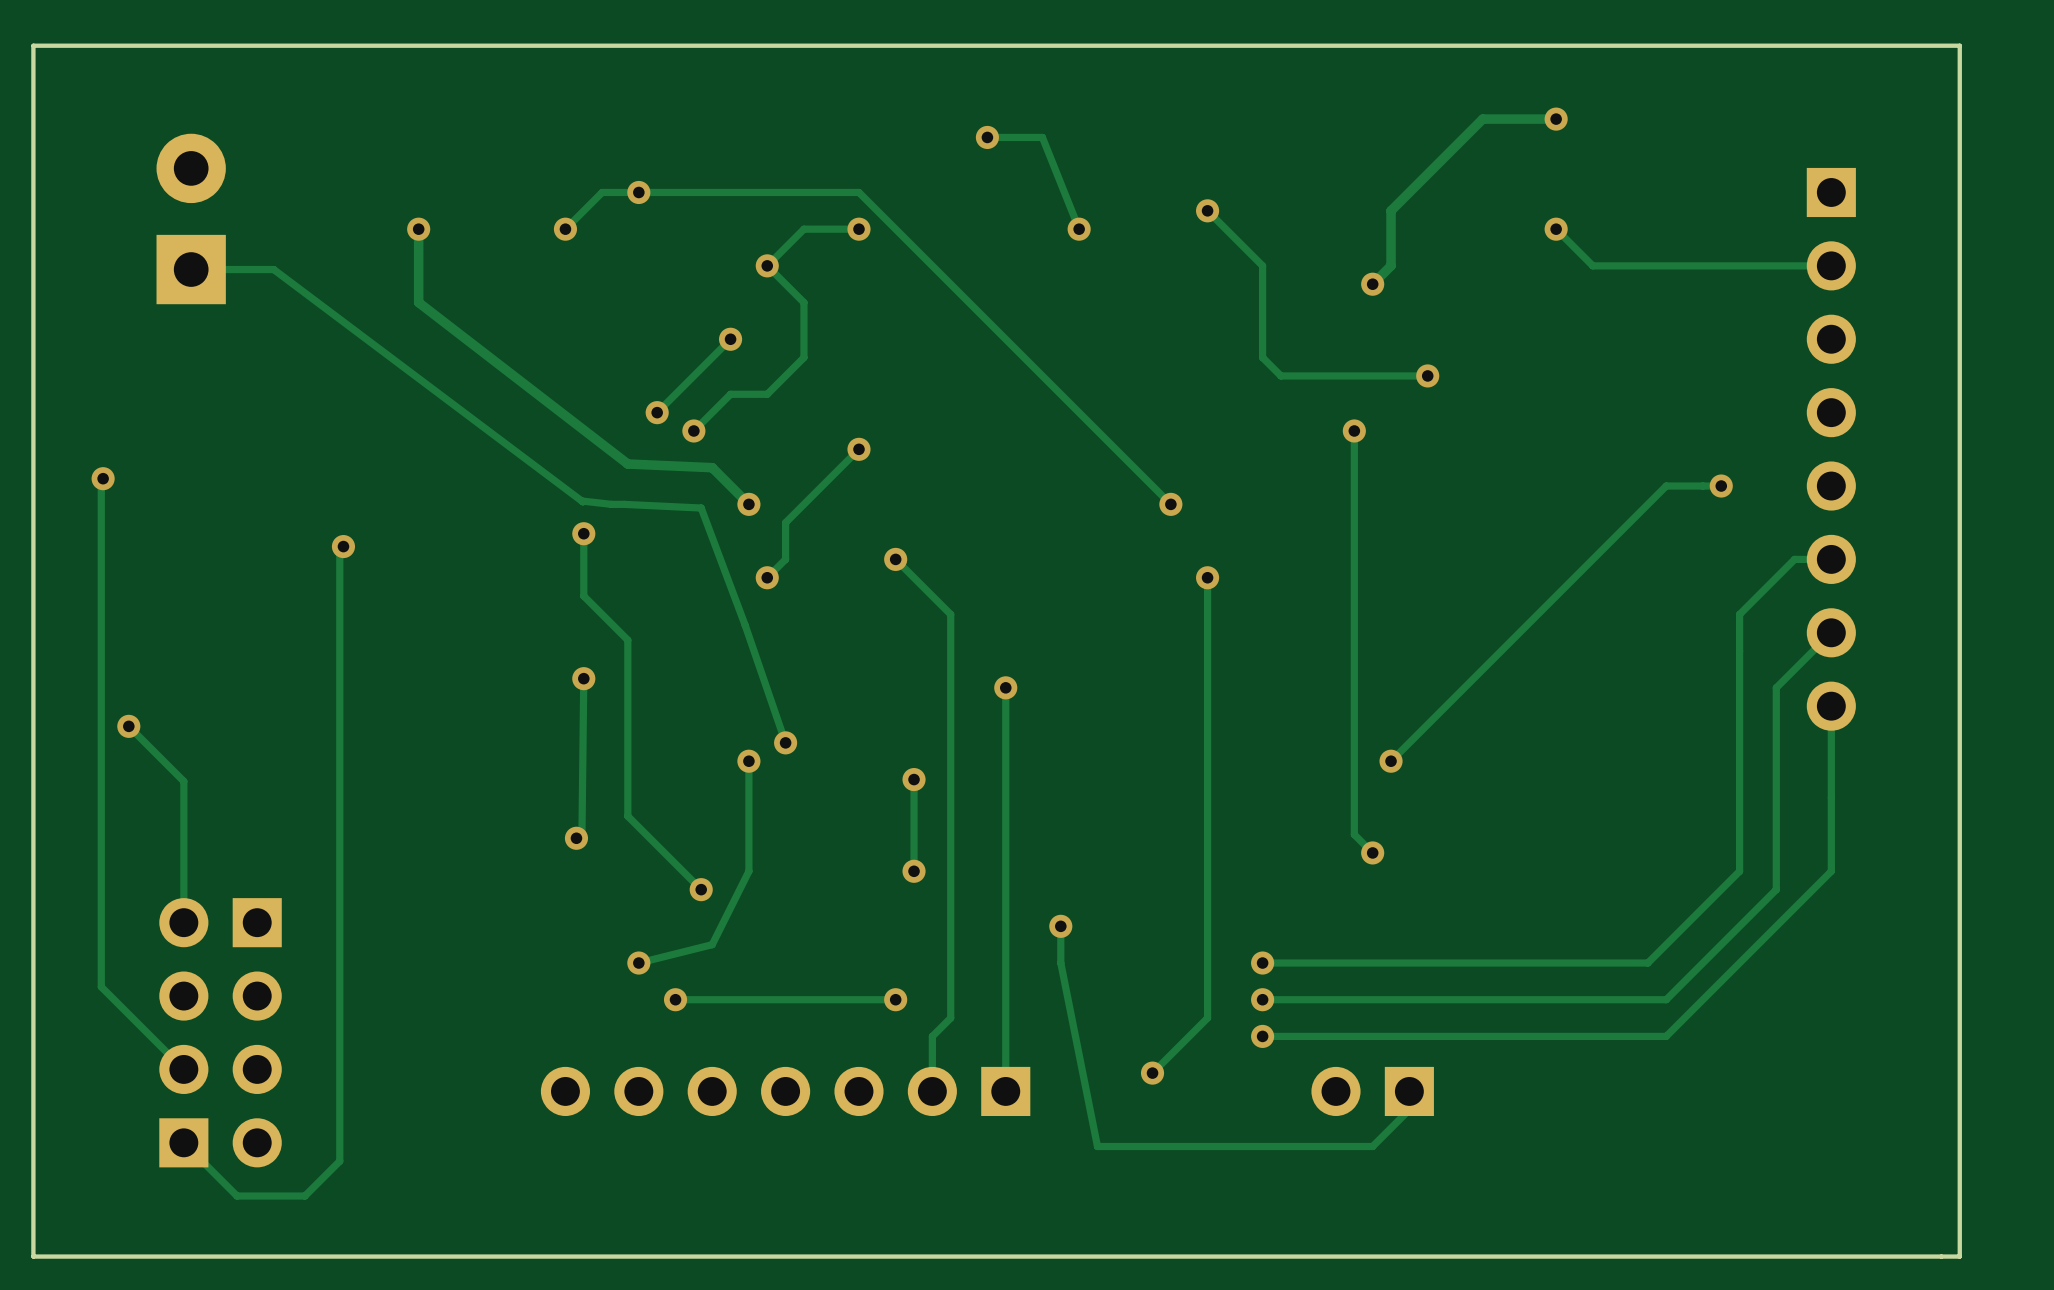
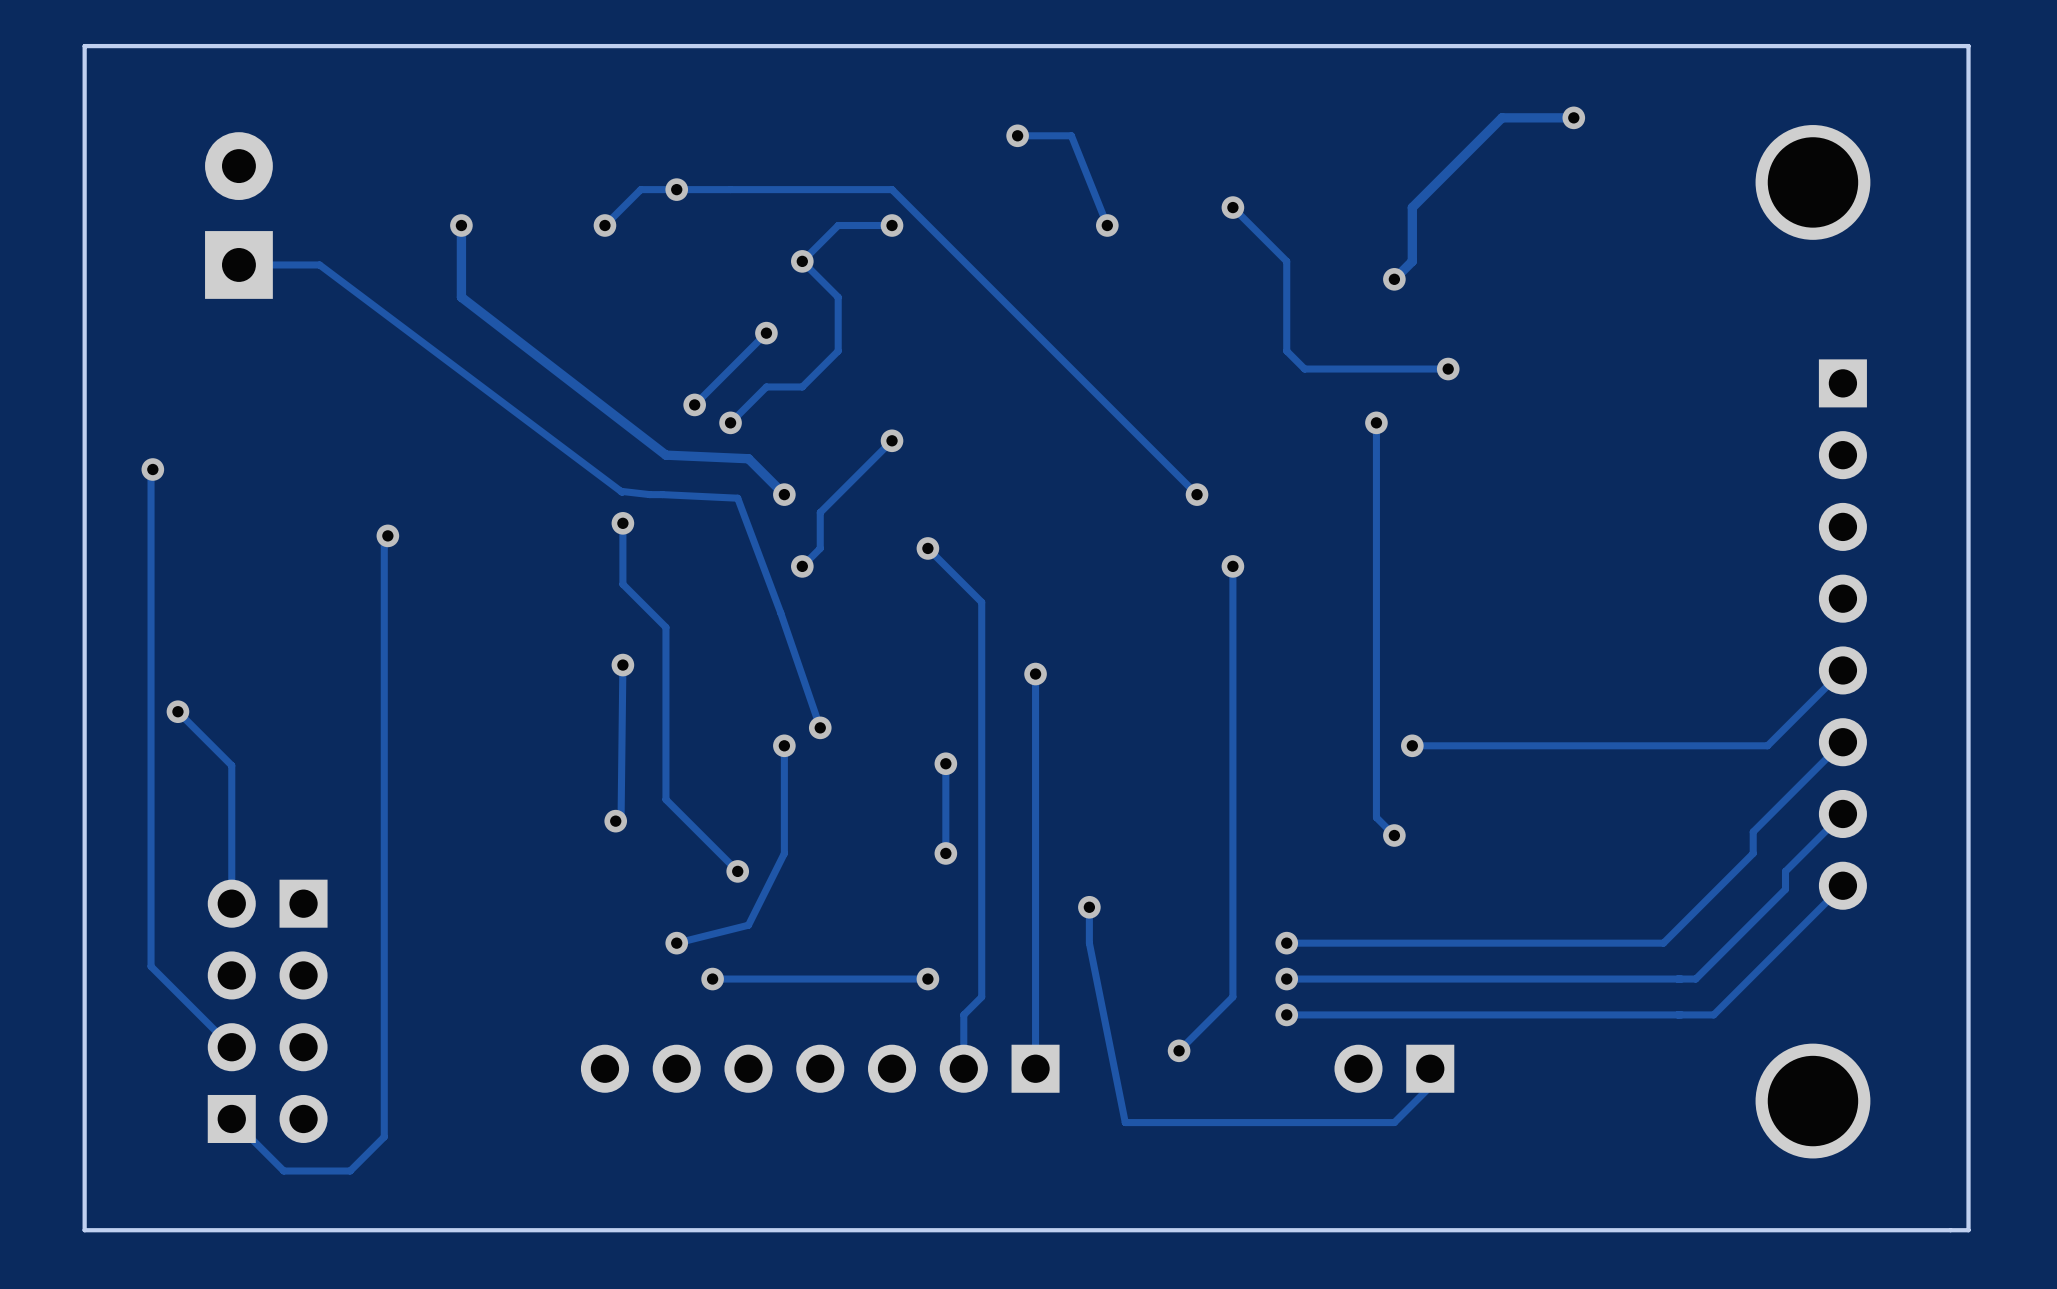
part: none -> (1812, 182)
track: (1556, 229) (1592, 265) (1831, 265) -> none
via: (1556, 229) -> none
part position: (1831, 449) -> (1842, 634)
track: (1721, 486) (1666, 486) (1391, 761) -> (1842, 670) (1767, 745) (1412, 745)
via: (1721, 486) -> none
track: (1831, 559) (1794, 559) (1739, 614) (1739, 849) -> (1842, 742) (1753, 831)
track: (1831, 632) (1776, 687) (1776, 889) (1666, 999) -> (1842, 813) (1785, 871) (1785, 889) (1695, 979) (1681, 979)
track: (1831, 706) (1831, 871) (1666, 1036) -> (1842, 885) (1713, 1014) (1681, 1014)
part: none -> (1812, 1101)

